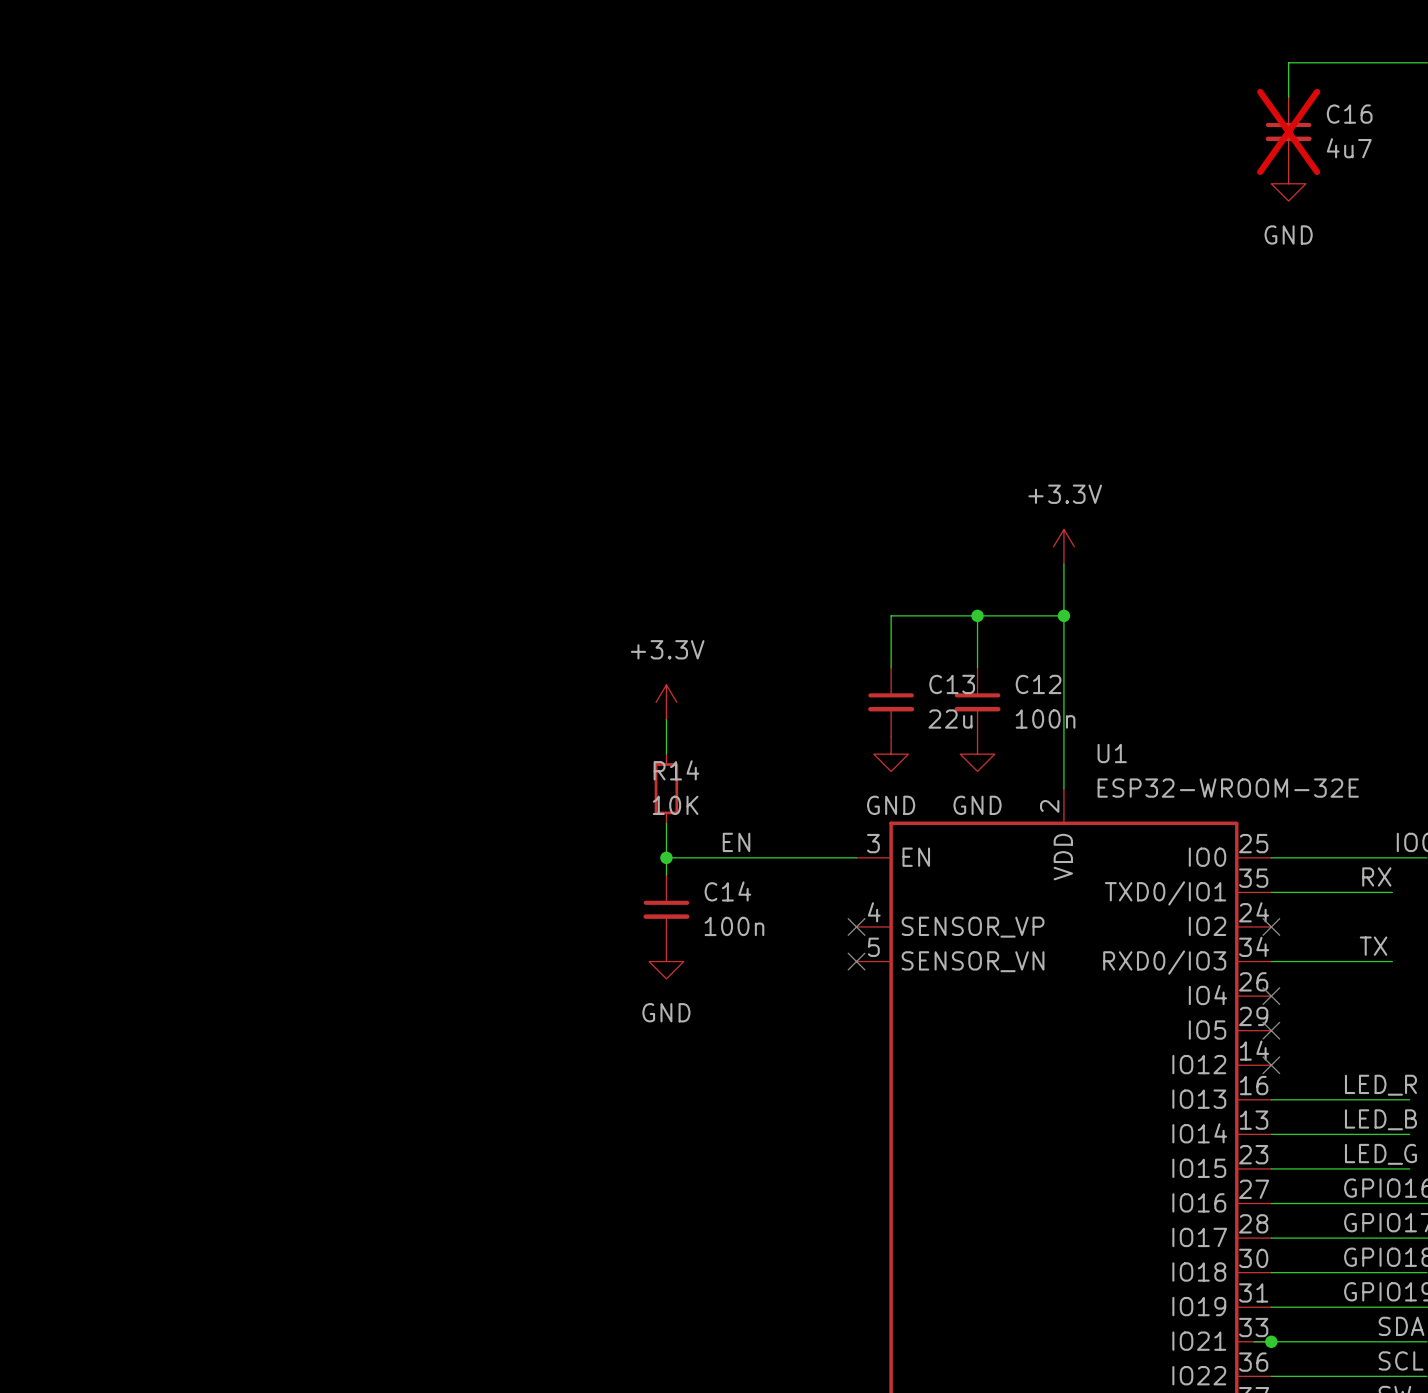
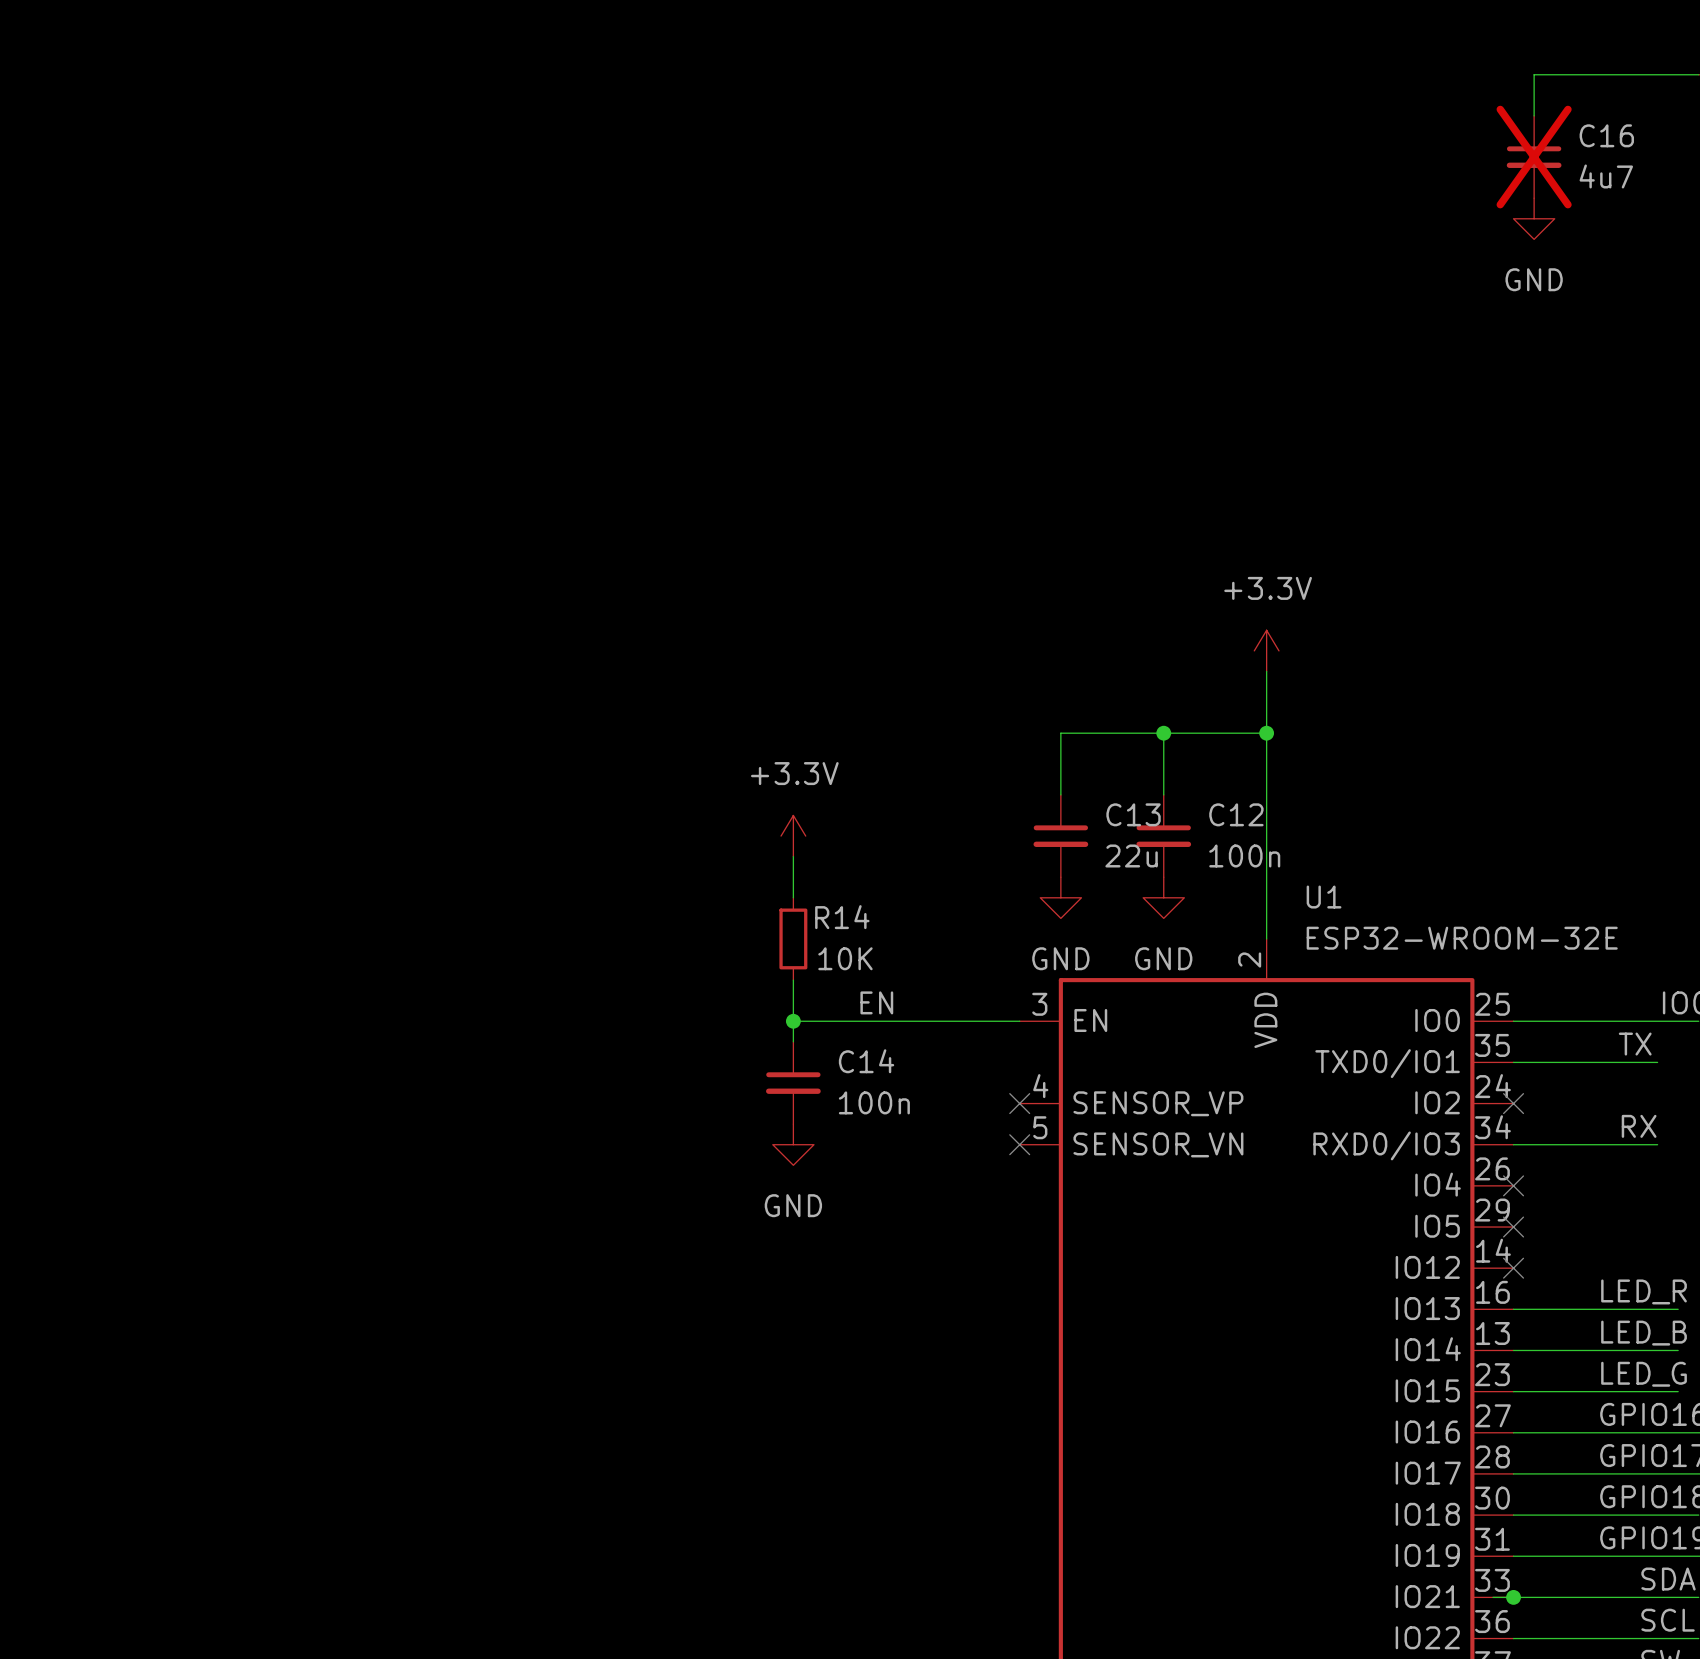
R14 name position: R14 (676, 770) -> R14 (842, 917)
R14 value position: 10K (675, 805) -> 10K (845, 958)
label: RX (1376, 876) -> TX (1635, 1044)
label: TX (1373, 946) -> RX (1639, 1126)

